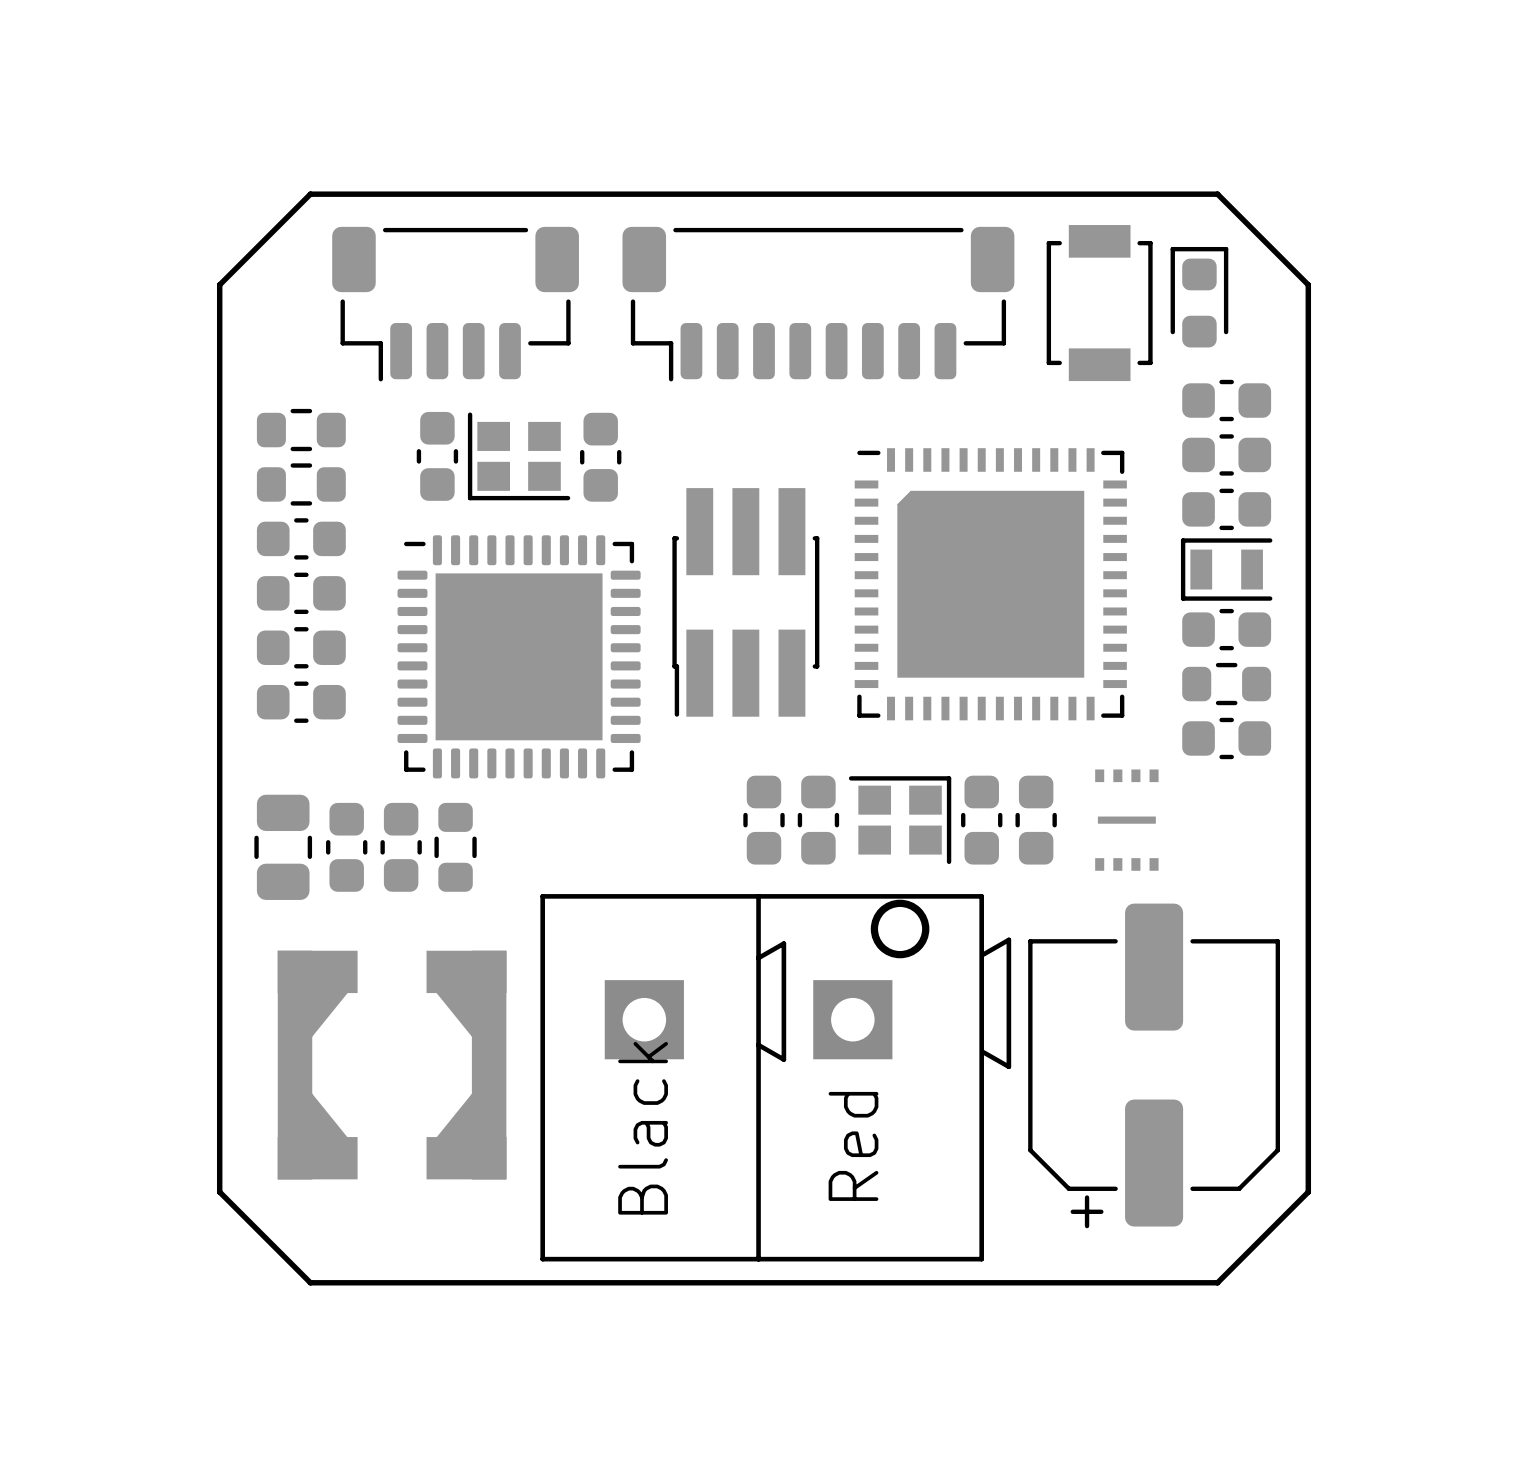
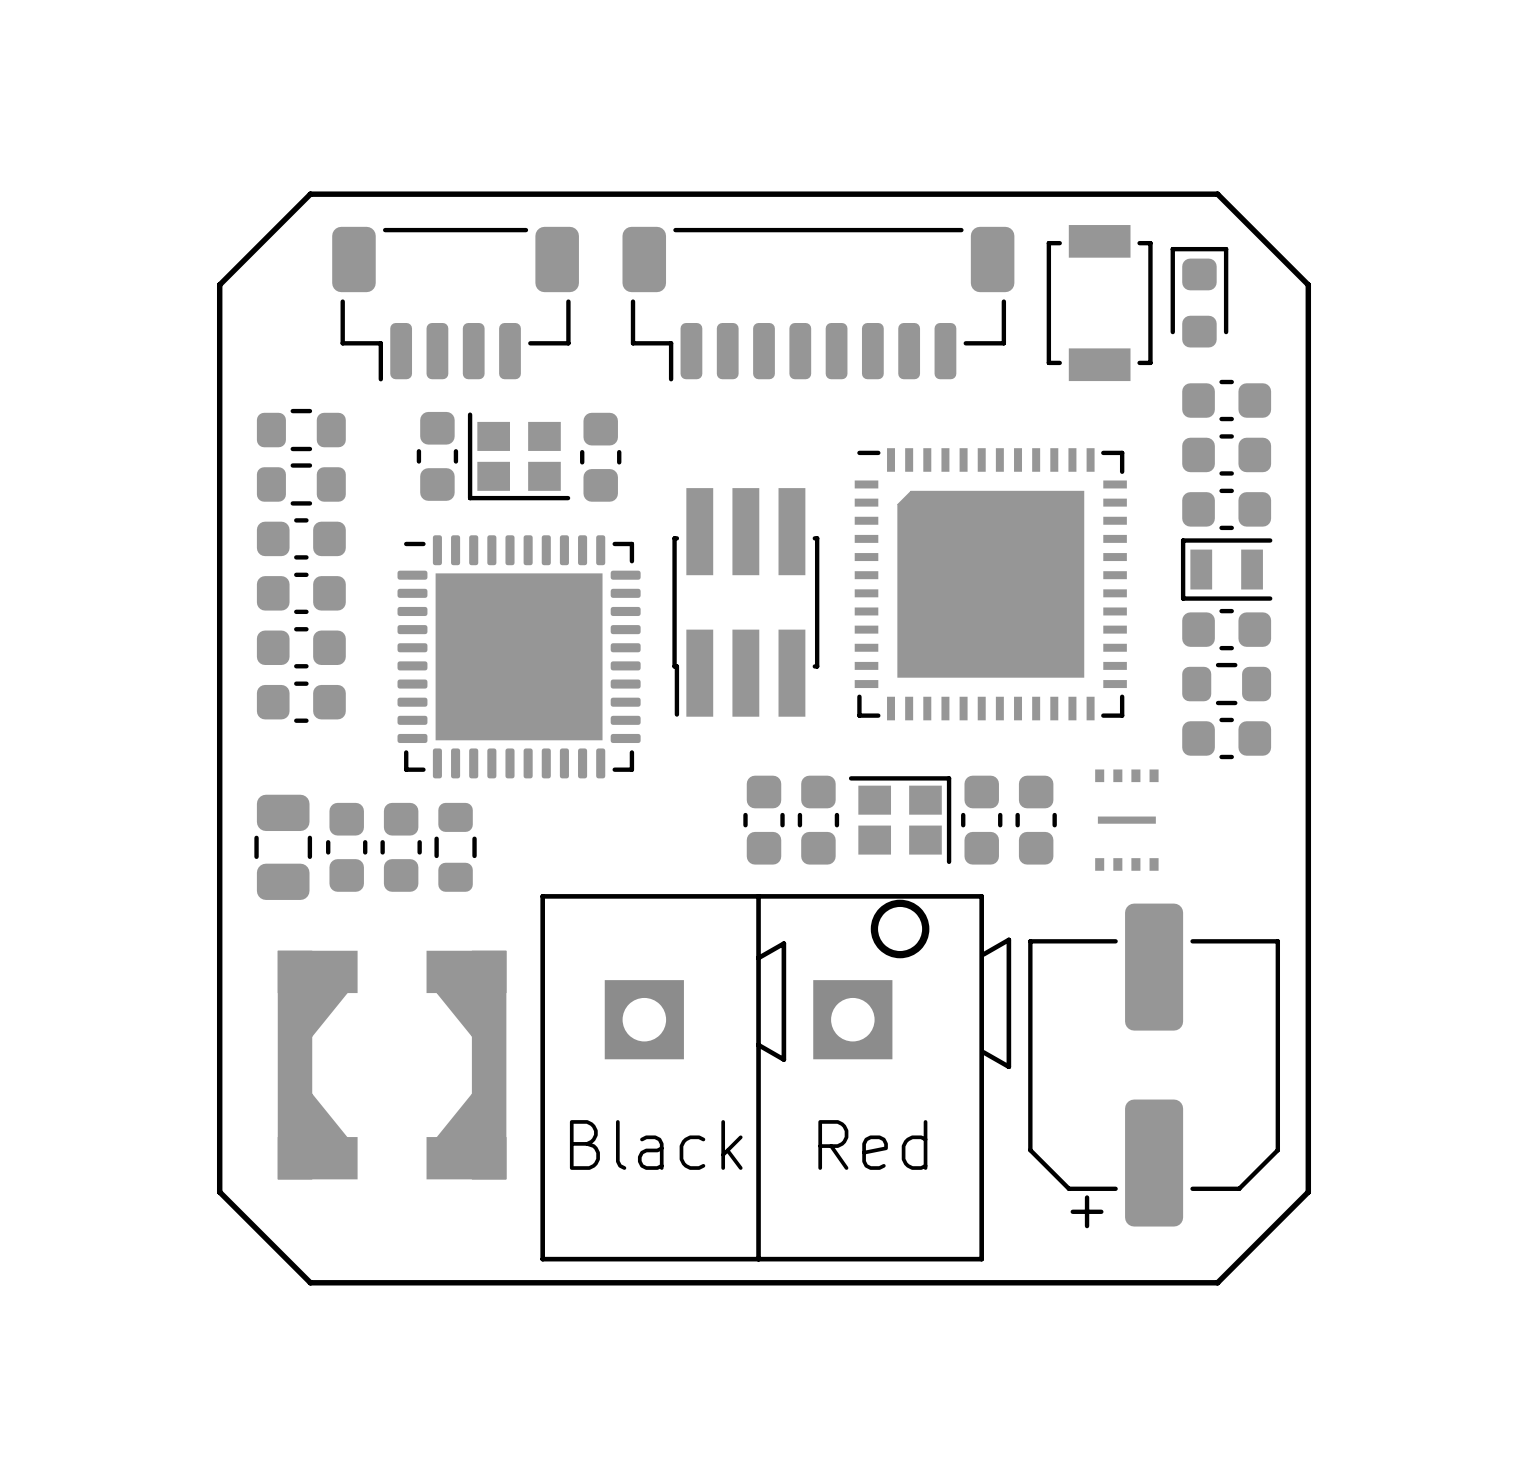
part text rotation: 0° (643, 1128) -> 90° clockwise (656, 1144)
part text rotation: 0° (853, 1146) -> 90° clockwise (872, 1144)

